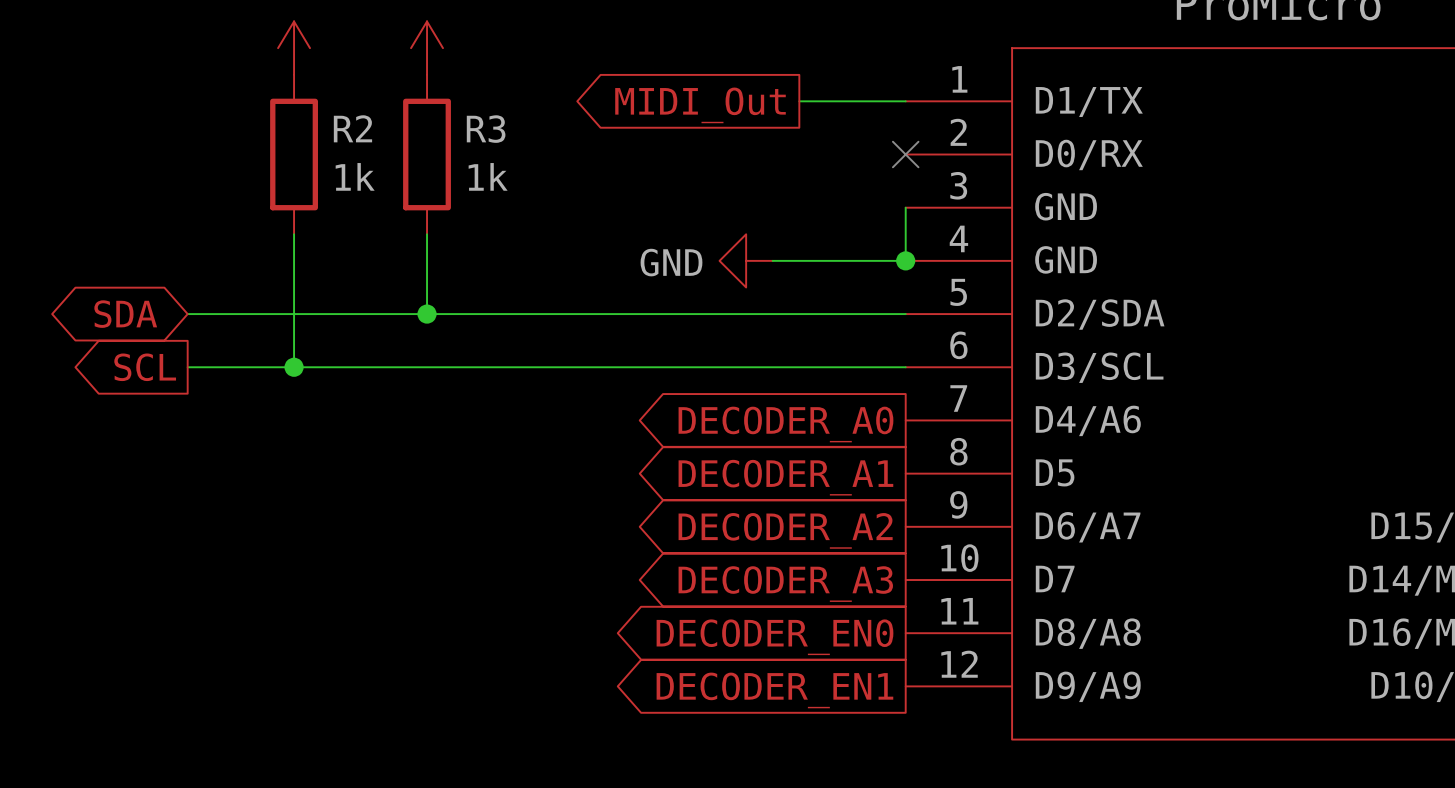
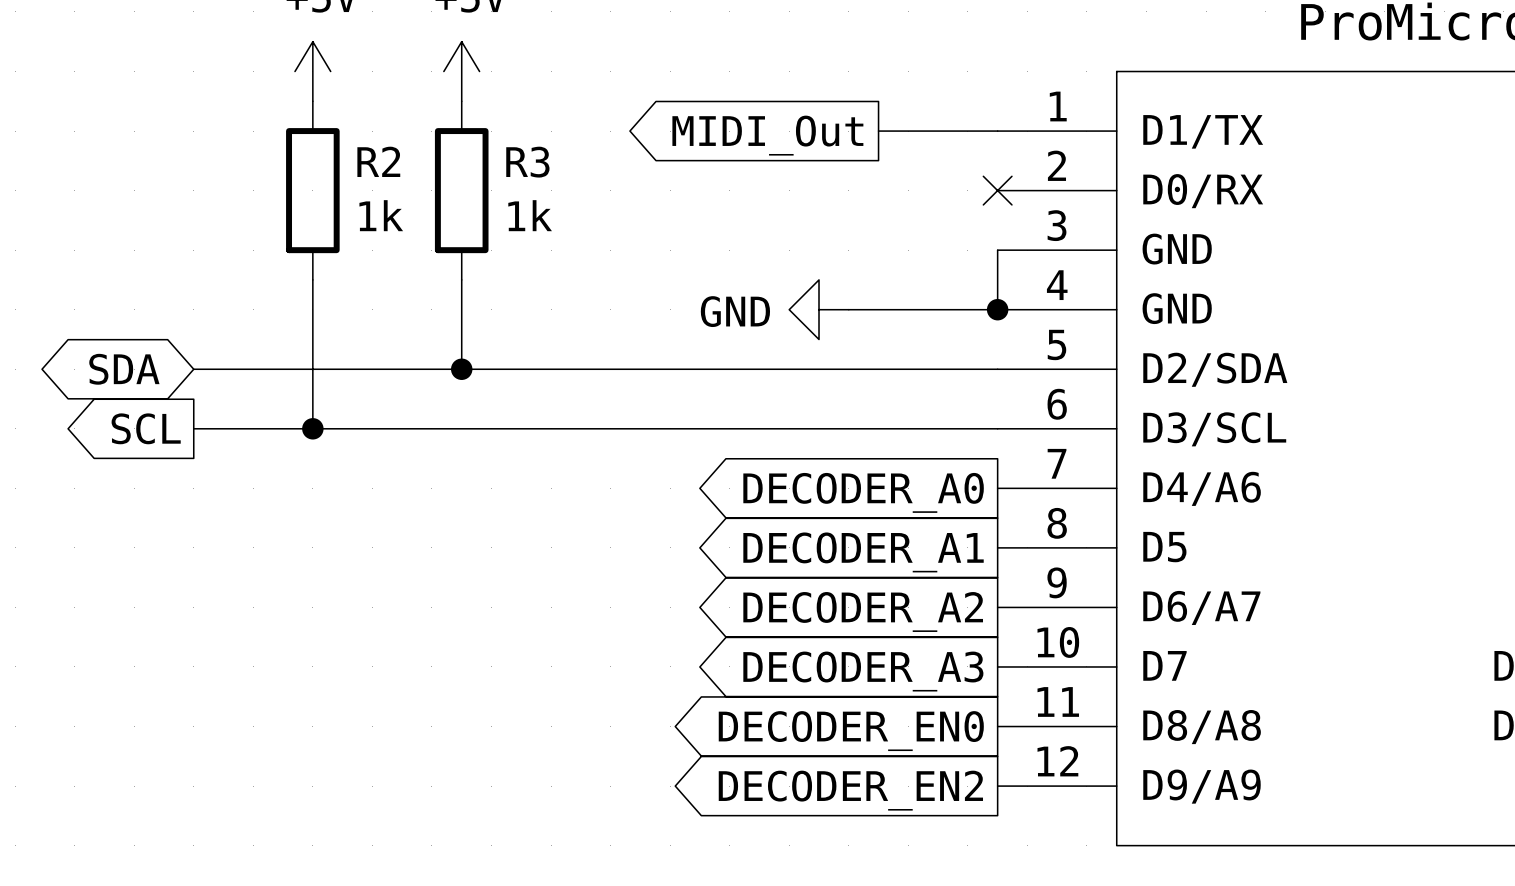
global label: DECODER_EN1 (774, 690) -> DECODER_EN2 (850, 790)

